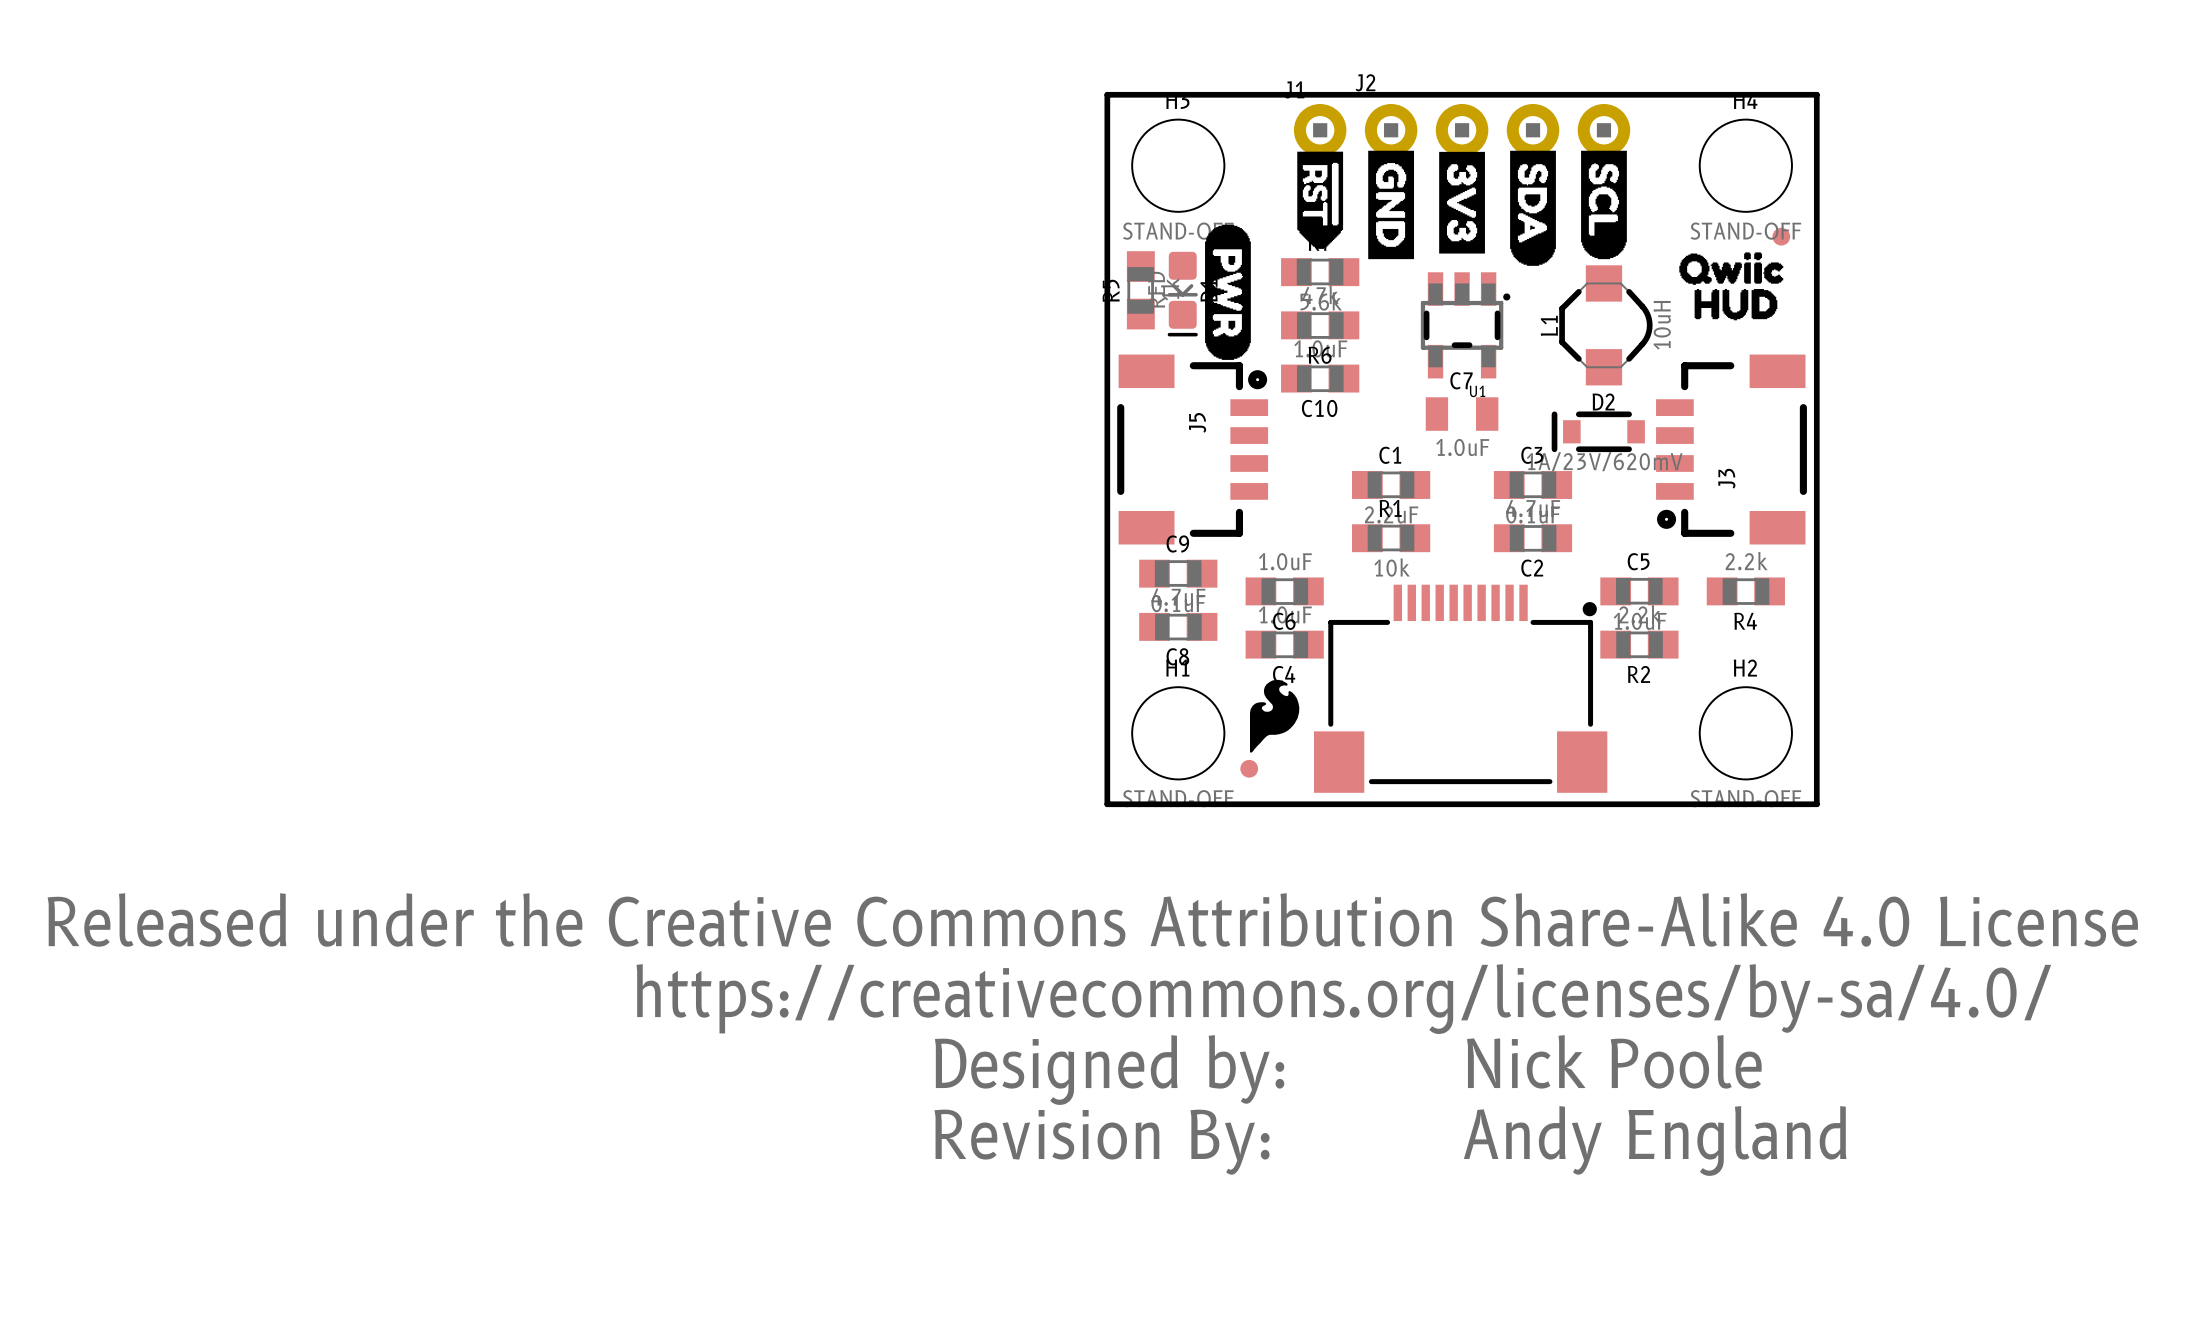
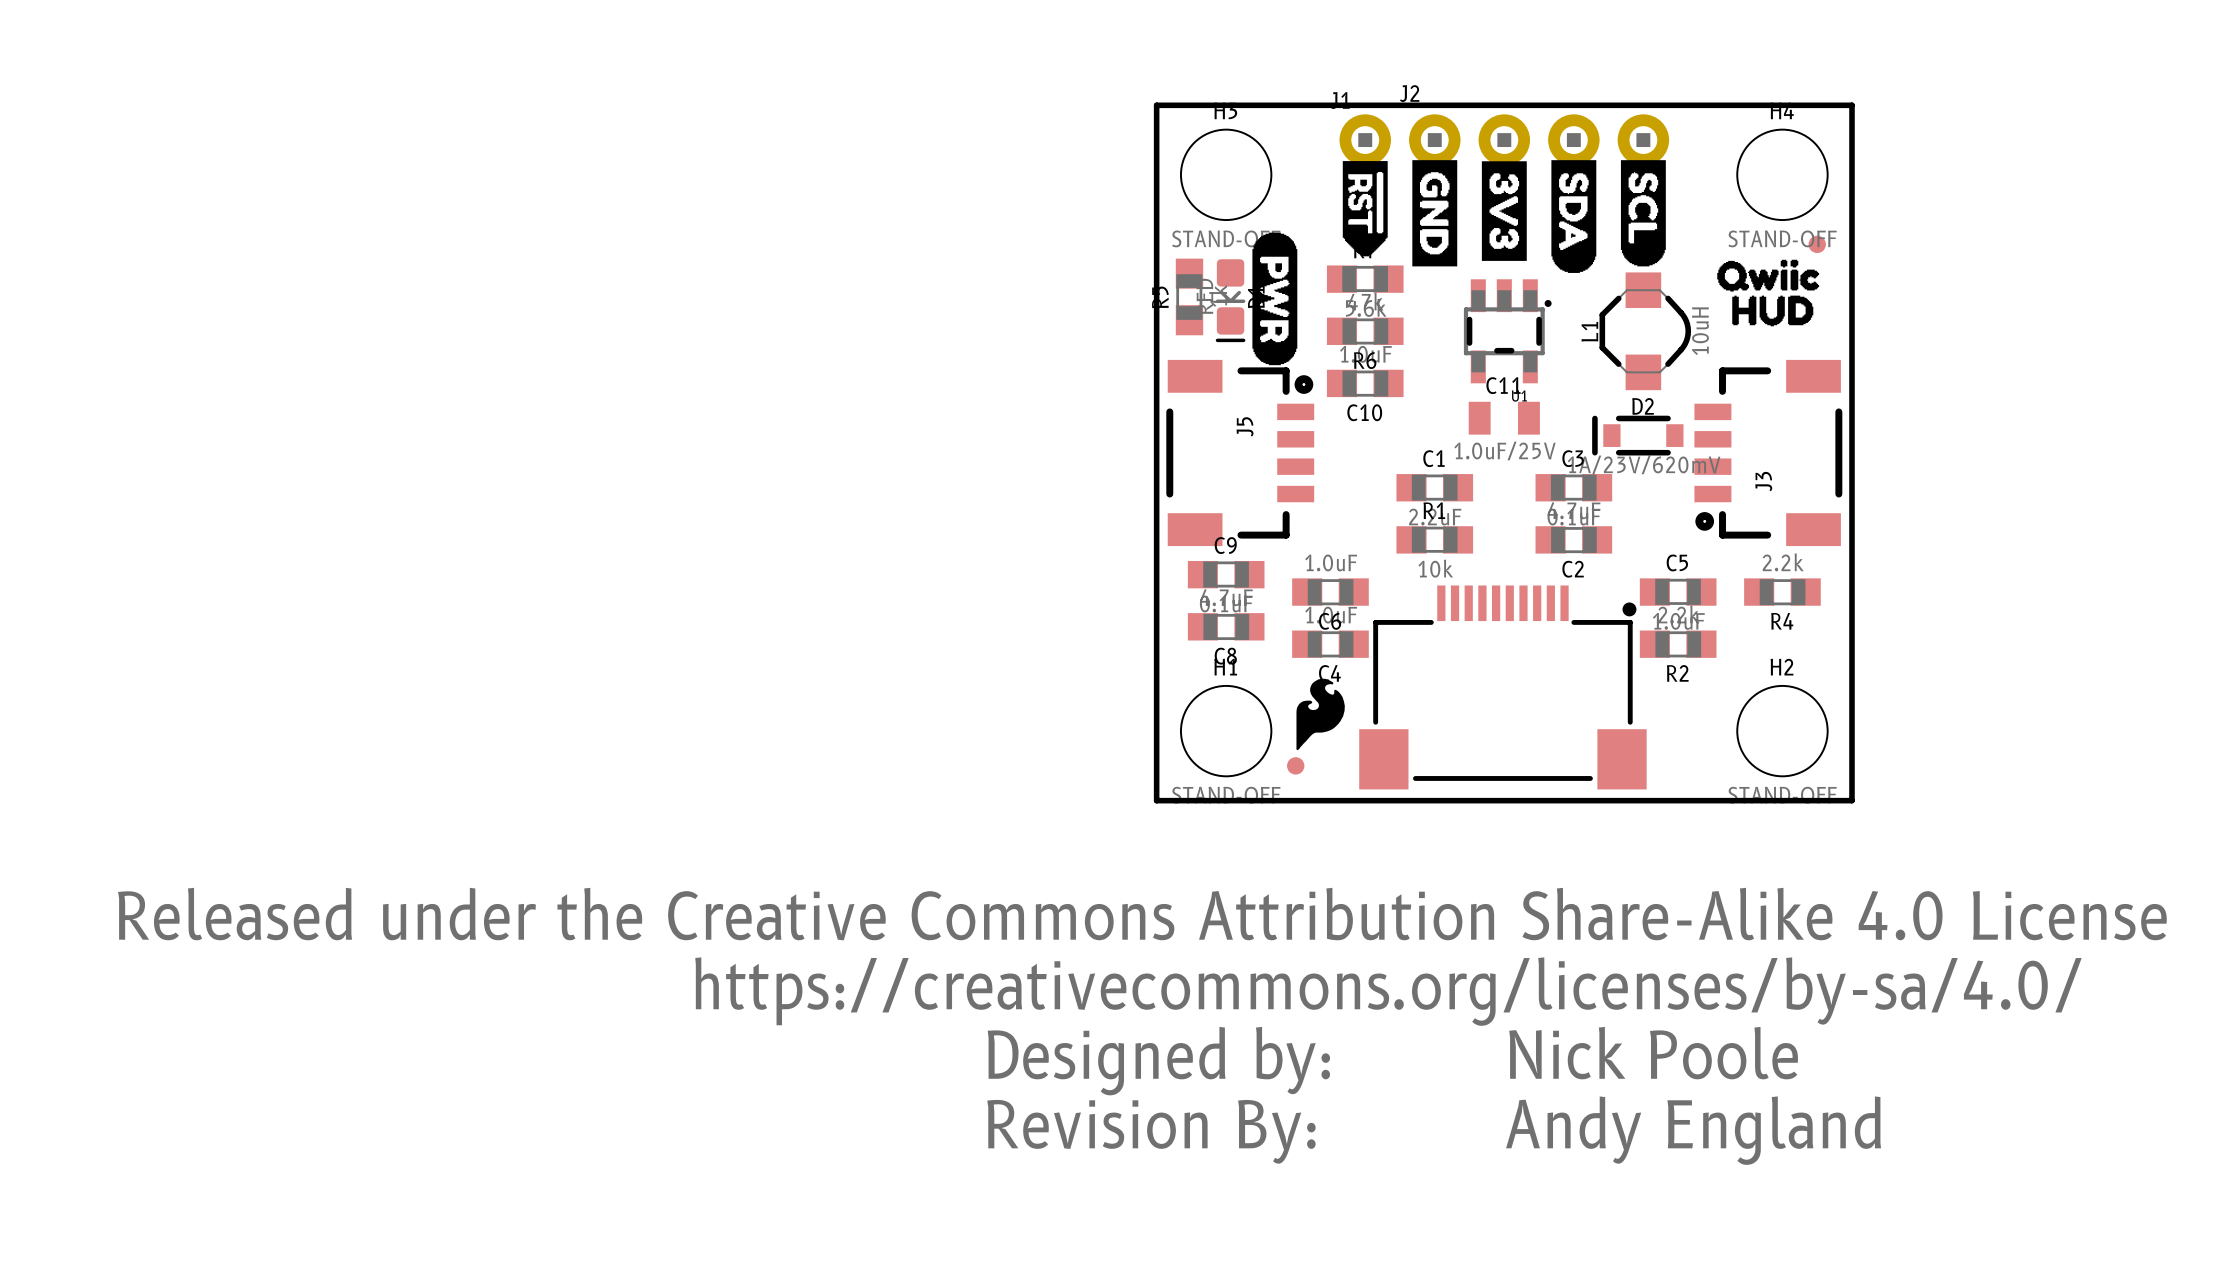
C7 name: C7 (1461, 380) -> C11 (1503, 385)
C7 value: 1.0uF (1462, 447) -> 1.0uF/25V (1504, 451)

